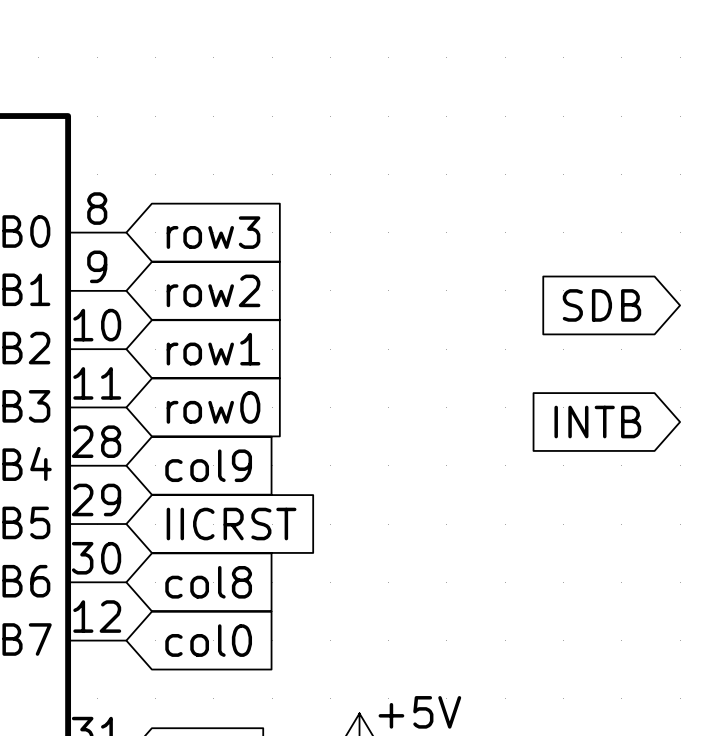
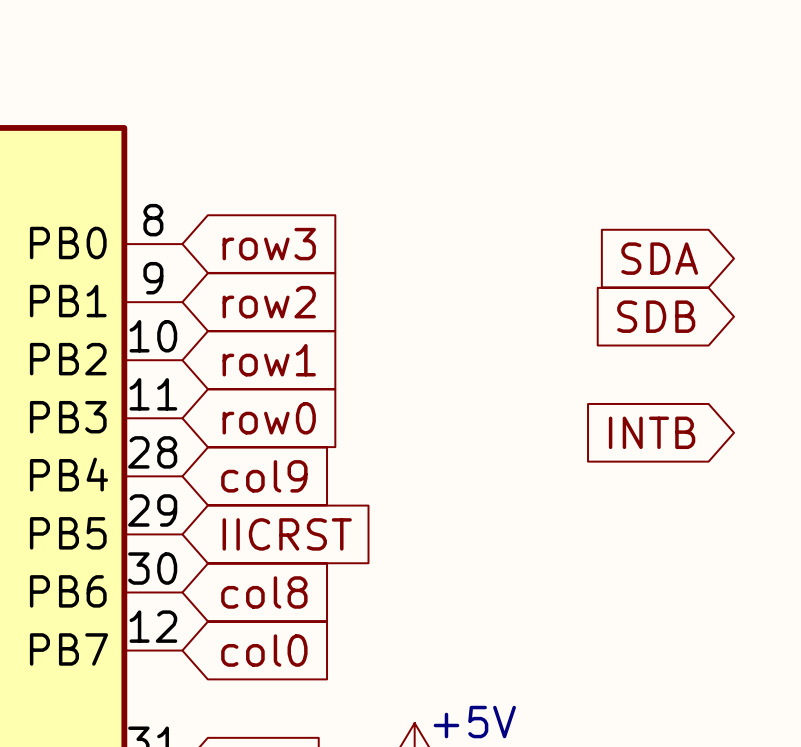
global label: none -> SDA (659, 258)

